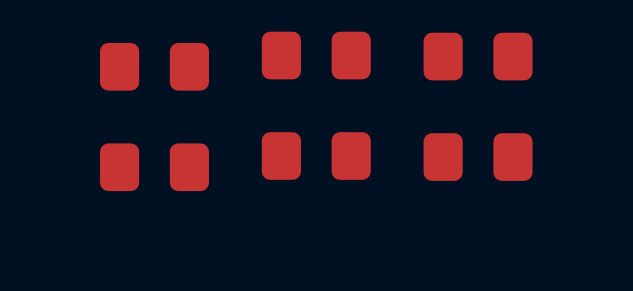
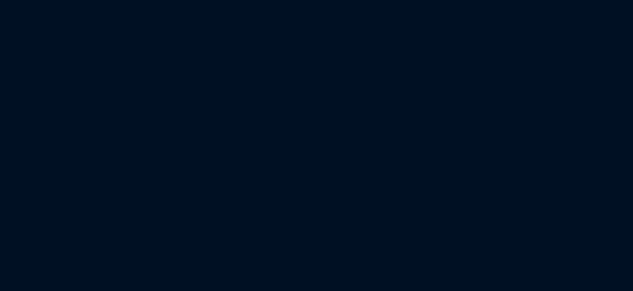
part: (316, 55) -> none
part: (478, 56) -> none
part: (154, 66) -> none
part: (316, 156) -> none
part: (478, 157) -> none
part: (154, 167) -> none

